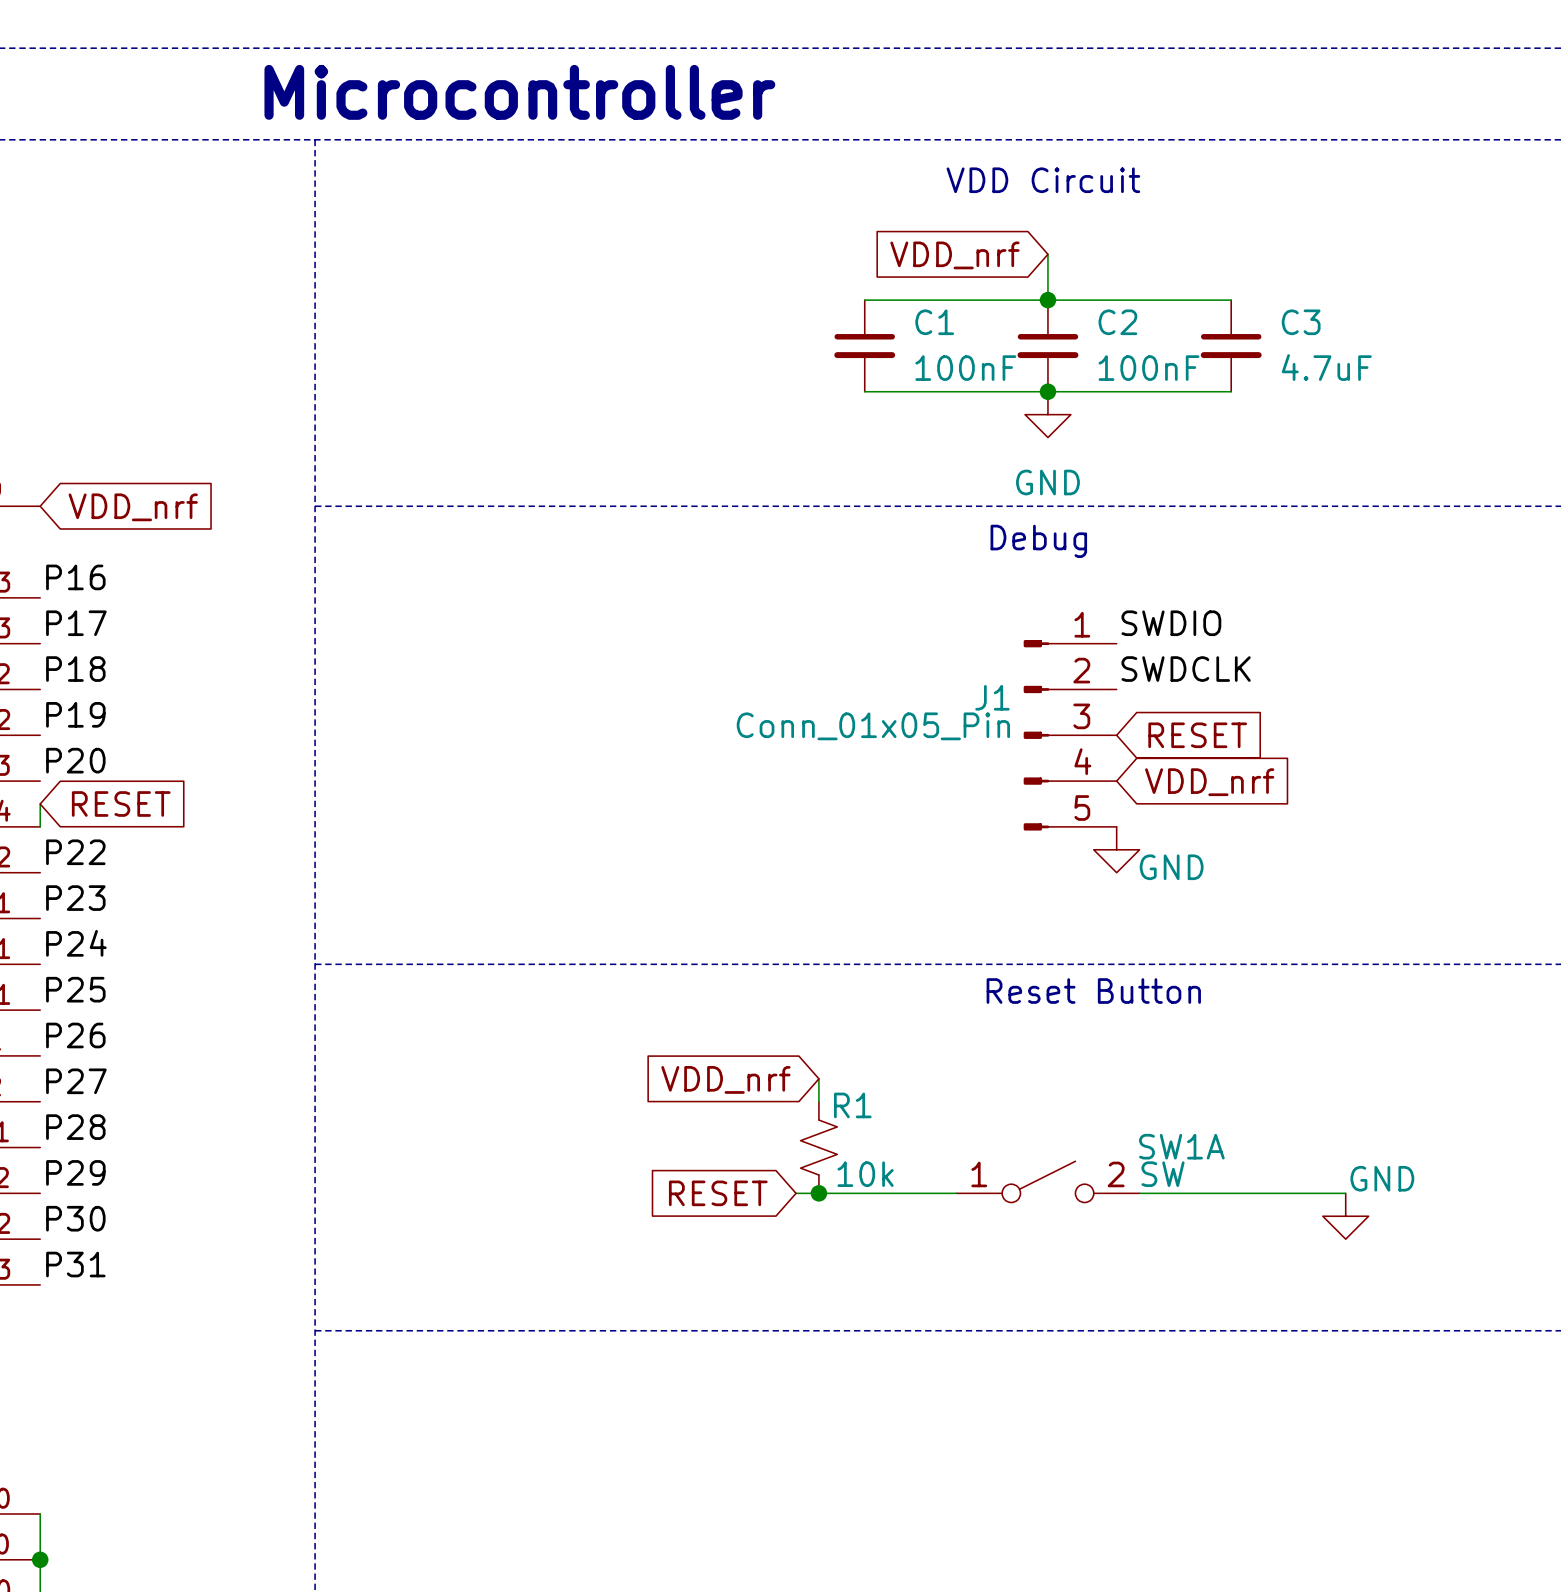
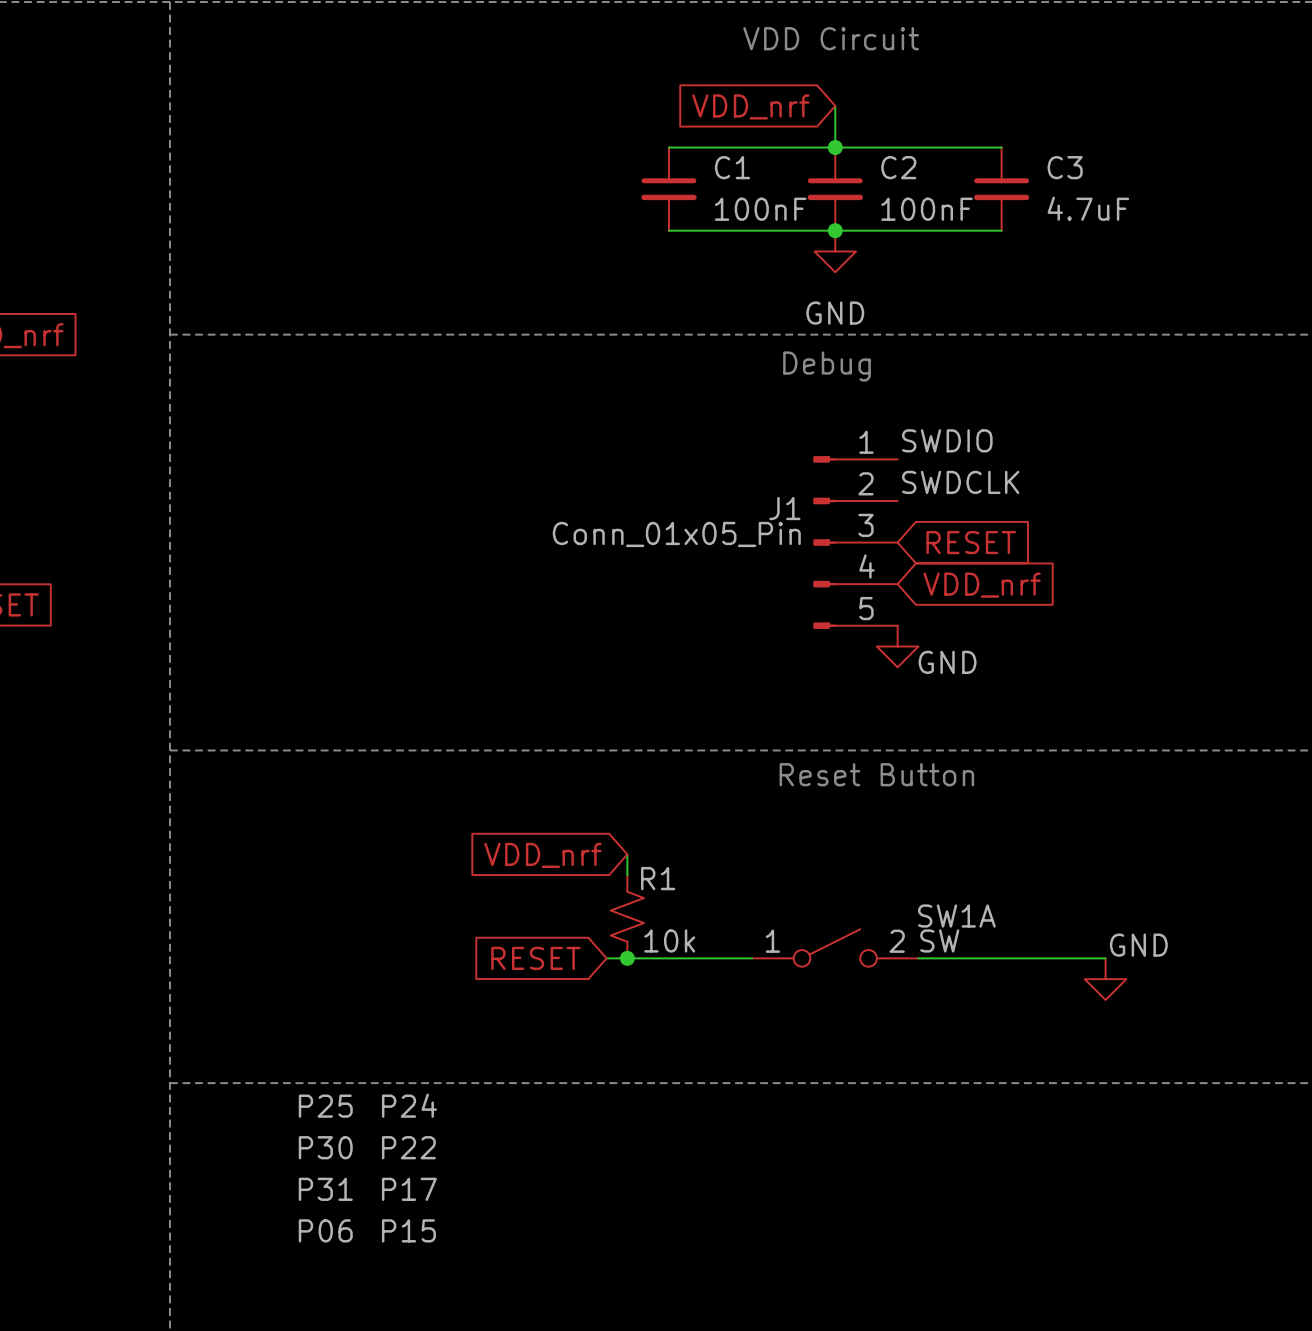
label: none -> P24 (409, 1105)
label: none -> P25 (325, 1106)
label: none -> P30 (325, 1147)
label: none -> P22 (408, 1147)
label: none -> P31 (325, 1189)
label: none -> P17 (409, 1189)
label: none -> P06 (325, 1230)
label: none -> P15 (408, 1230)

